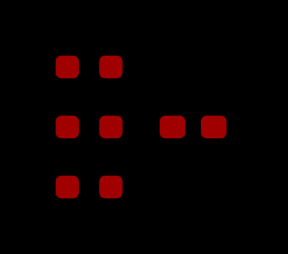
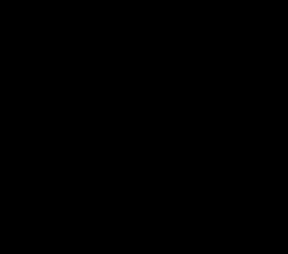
part: (89, 66) -> none
part: (89, 126) -> none
part: (193, 126) -> none
part: (89, 187) -> none

